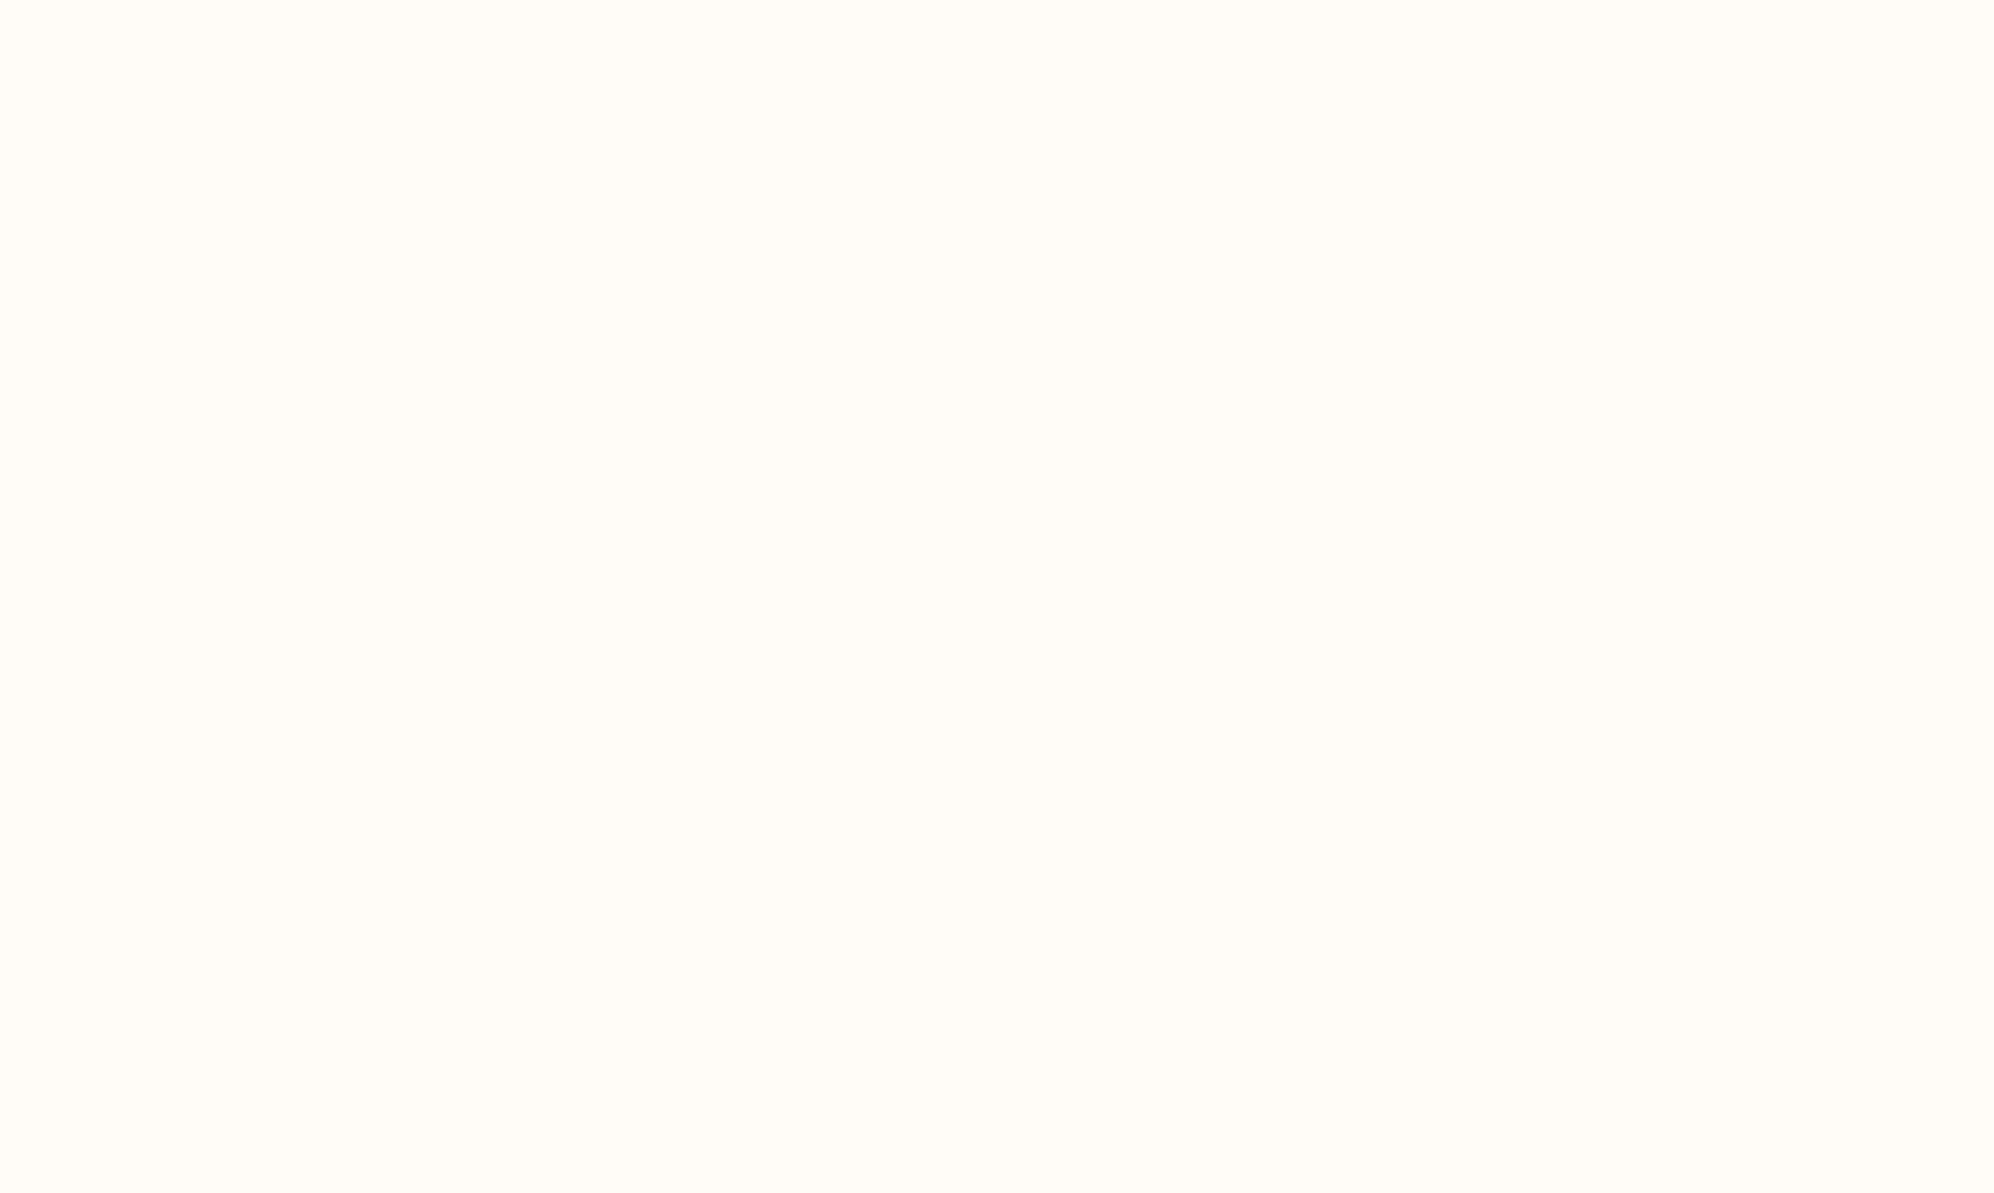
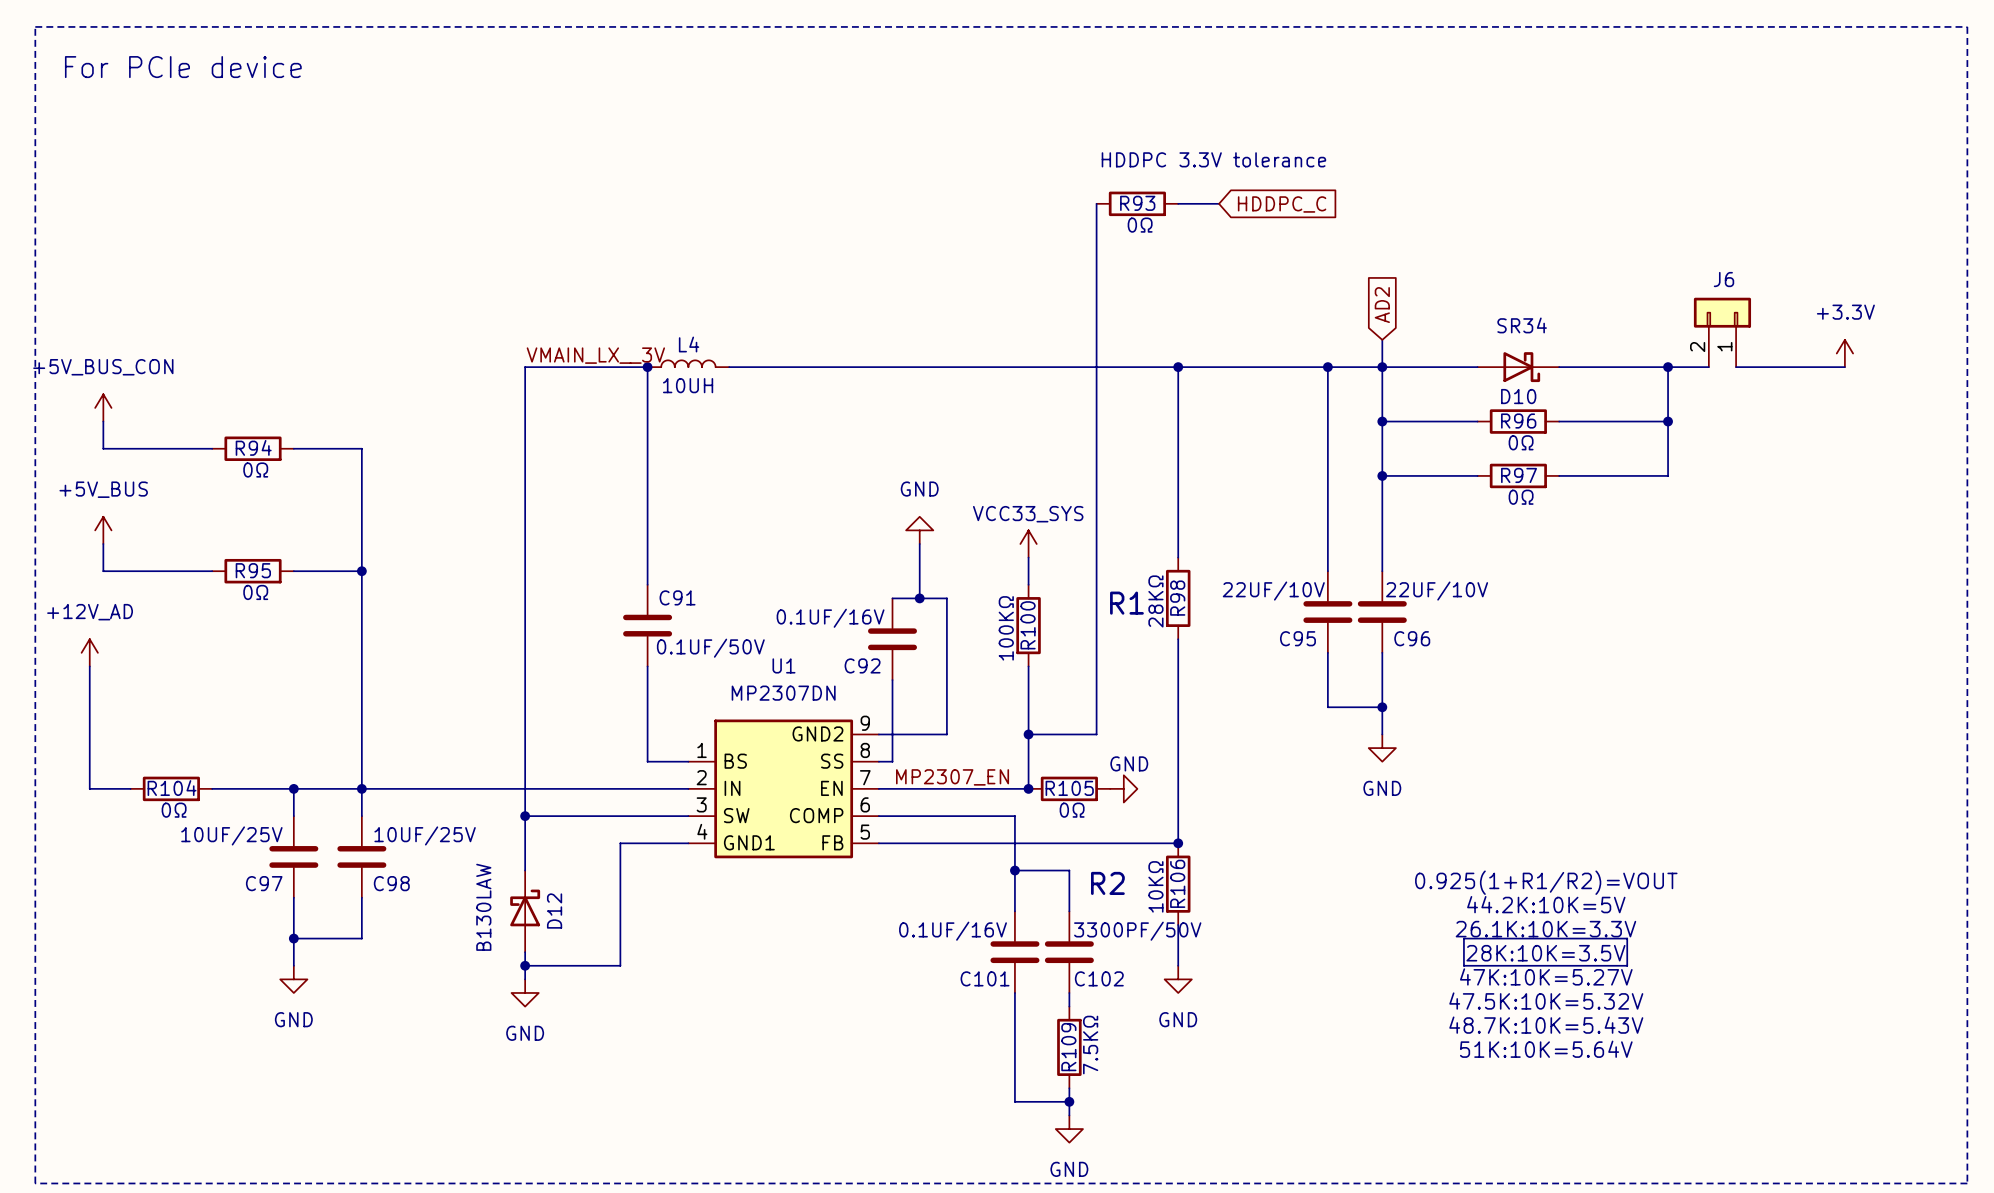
line: none -> (35, 26) (1967, 26) (1967, 1183) (35, 1183) (35, 26)
text: none -> For PCIe device (183, 67)
text: none -> HDDPC 3.3V tolerance (1213, 159)
wire: none -> (1096, 203) (1096, 734) (1028, 734)
R93: none -> 0Ω (1137, 203)
wire: none -> (1178, 203) (1219, 203)
global label: none -> HDDPC_C (1282, 204)
global label: none -> AD2 (1382, 305)
J6: none -> (1722, 332)
wire: none -> (1382, 339) (1382, 571)
power symbol: none -> +3.3V (1844, 353)
label: none -> VMAIN_LX__3V (595, 355)
L4: none -> 10UH (688, 363)
junction: none -> (647, 367)
wire: none -> (729, 367) (1477, 367)
wire: none -> (1178, 367) (1178, 557)
junction: none -> (1178, 367)
wire: none -> (1327, 367) (1327, 571)
junction: none -> (1327, 367)
junction: none -> (1382, 367)
D10: none -> SR34 (1518, 367)
wire: none -> (1559, 367) (1708, 367)
wire: none -> (1668, 367) (1668, 475) (1559, 475)
junction: none -> (1668, 367)
wire: none -> (1736, 367) (1844, 367)
power symbol: none -> +5V_BUS_CON (103, 407)
wire: none -> (103, 421) (103, 448) (212, 448)
wire: none -> (1382, 421) (1477, 421)
junction: none -> (1382, 421)
R96: none -> 0Ω (1518, 421)
wire: none -> (1559, 421) (1668, 421)
junction: none -> (1668, 421)
R94: none -> 0Ω (253, 448)
wire: none -> (293, 448) (361, 448) (361, 816)
wire: none -> (1382, 475) (1477, 475)
junction: none -> (1382, 475)
R97: none -> 0Ω (1518, 475)
power symbol: none -> +5V_BUS (103, 530)
power symbol: none -> GND (919, 530)
wire: none -> (103, 543) (103, 571) (212, 571)
wire: none -> (919, 543) (919, 598)
power symbol: none -> VCC33_SYS (1028, 543)
wire: none -> (1028, 557) (1028, 584)
R95: none -> 0Ω (253, 571)
wire: none -> (293, 571) (361, 571)
junction: none -> (361, 571)
wire: none -> (647, 584) (647, 367) (525, 367) (525, 870)
wire: none -> (892, 598) (946, 598) (946, 734) (878, 734)
junction: none -> (919, 598)
R98: none -> 28KΩ (1178, 598)
text: none -> R1 (1126, 603)
C95: none -> 22UF/10V (1327, 612)
C96: none -> 22UF/10V (1382, 612)
C91: none -> 0.1UF/50V (647, 625)
R100: none -> 100KΩ (1028, 625)
C92: none -> 0.1UF/16V (892, 639)
wire: none -> (1178, 639) (1178, 843) (878, 843)
power symbol: none -> +12V_AD (89, 652)
wire: none -> (1327, 652) (1327, 707) (1382, 707)
wire: none -> (1382, 652) (1382, 734)
wire: none -> (89, 666) (89, 788) (130, 788)
wire: none -> (647, 666) (647, 761) (688, 761)
wire: none -> (1028, 666) (1028, 788) (878, 788)
wire: none -> (892, 680) (892, 761) (878, 761)
junction: none -> (1382, 707)
junction: none -> (1028, 734)
power symbol: none -> GND (1382, 748)
label: none -> MP2307_EN (952, 777)
R104: none -> 0Ω (171, 788)
wire: none -> (212, 788) (688, 788)
wire: none -> (293, 788) (293, 816)
junction: none -> (293, 788)
junction: none -> (361, 788)
U1: none -> MP2307DN (783, 788)
junction: none -> (1028, 788)
R105: none -> 0Ω (1069, 788)
power symbol: none -> GND (1123, 788)
wire: none -> (525, 816) (688, 816)
junction: none -> (525, 816)
wire: none -> (878, 816) (1014, 816) (1014, 911)
wire: none -> (688, 843) (620, 843) (620, 965) (525, 965)
junction: none -> (1178, 843)
C97: none -> 10UF/25V (293, 856)
C98: none -> 10UF/25V (361, 856)
wire: none -> (1014, 870) (1069, 870) (1069, 911)
junction: none -> (1014, 870)
text: none -> 0.925(1+R1/R2)=VOUT (1546, 882)
text: none -> R2 (1107, 883)
R106: none -> 10KΩ (1178, 884)
wire: none -> (293, 897) (293, 965)
wire: none -> (361, 897) (361, 938) (293, 938)
text: none -> 44.2K:10K=5V (1546, 904)
D12: none -> B130LAW (525, 911)
wire: none -> (1178, 924) (1178, 965)
text: none -> 26.1K:10K=3.3V (1545, 929)
junction: none -> (293, 938)
line: none -> (1463, 938) (1627, 938) (1627, 965) (1463, 965) (1463, 938)
wire: none -> (525, 952) (525, 979)
C101: none -> 0.1UF/16V (1014, 952)
C102: none -> 3300PF/50V (1069, 952)
text: none -> 28K:10K=3.5V (1545, 953)
junction: none -> (525, 965)
text: none -> 47K:10K=5.27V (1546, 976)
power symbol: none -> GND (293, 979)
power symbol: none -> GND (1178, 979)
power symbol: none -> GND (525, 992)
wire: none -> (1014, 992) (1014, 1101) (1069, 1101)
wire: none -> (1069, 992) (1069, 1006)
text: none -> 47.5K:10K=5.32V (1546, 1001)
text: none -> 48.7K:10K=5.43V (1546, 1025)
R109: none -> 7.5KΩ (1069, 1047)
text: none -> 51K:10K=5.64V (1546, 1049)
wire: none -> (1069, 1088) (1069, 1115)
junction: none -> (1069, 1101)
power symbol: none -> GND (1069, 1129)

